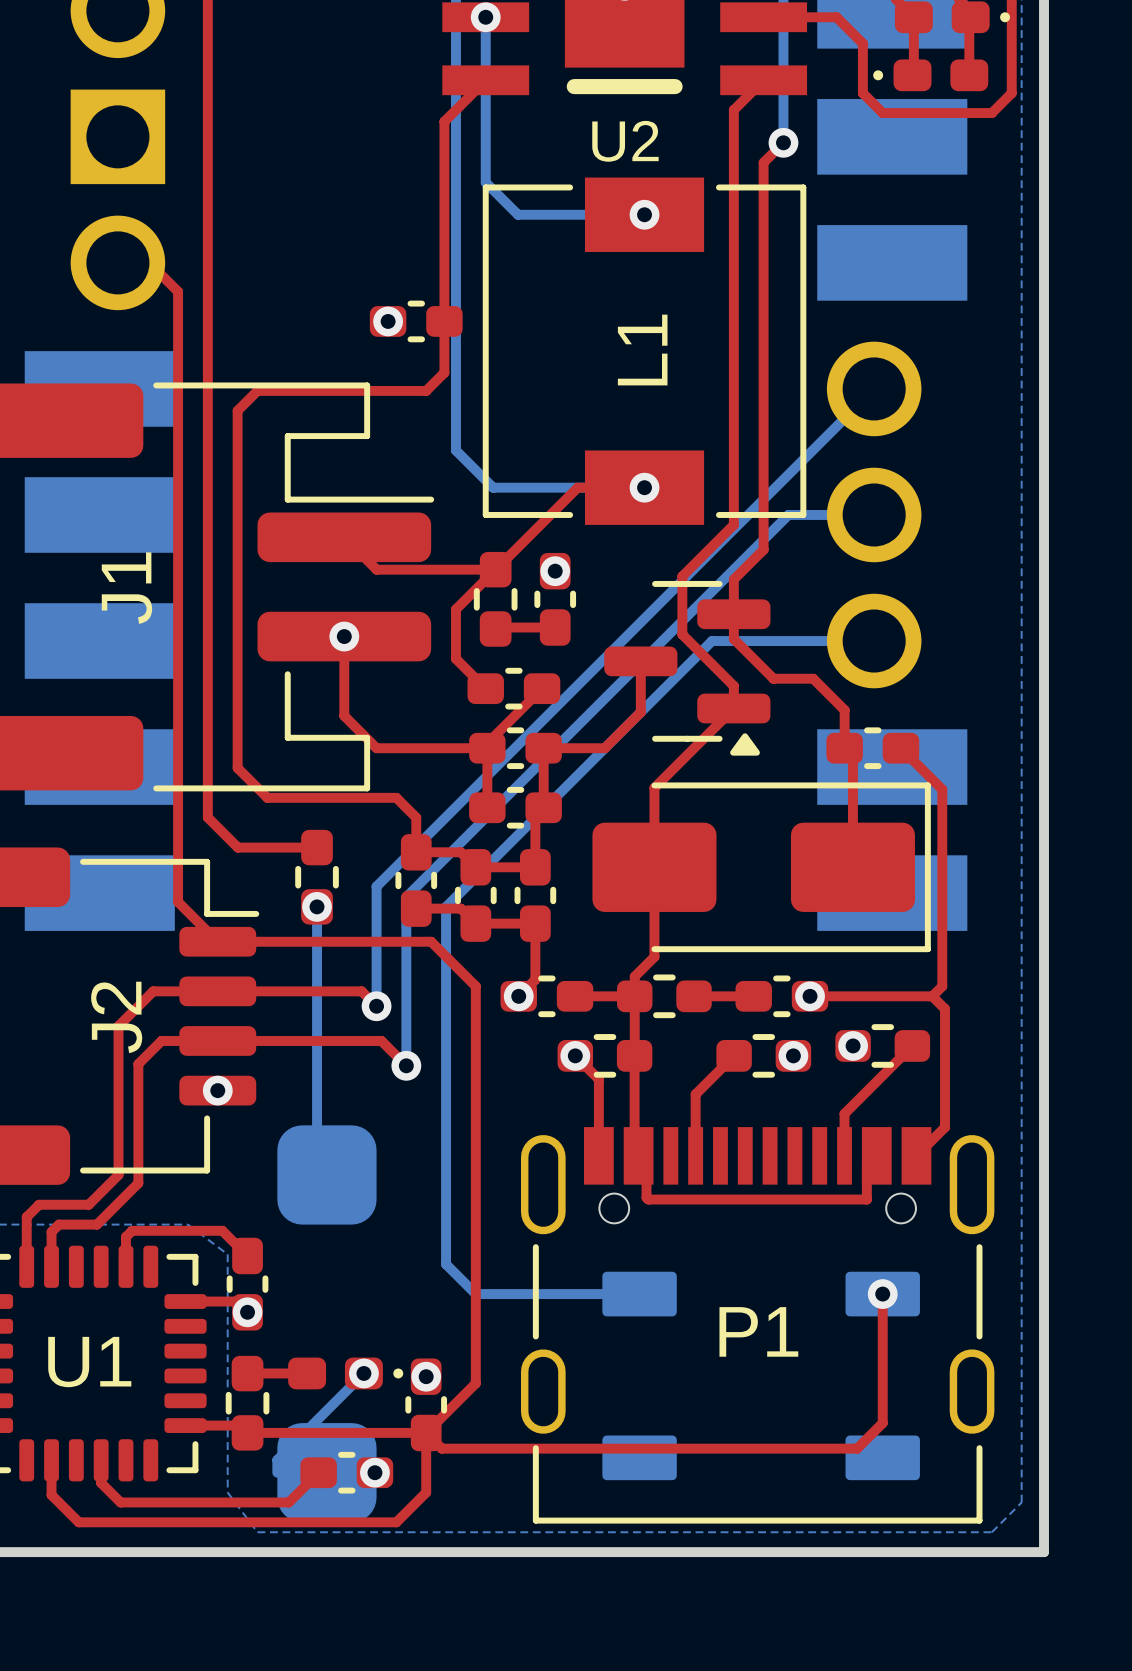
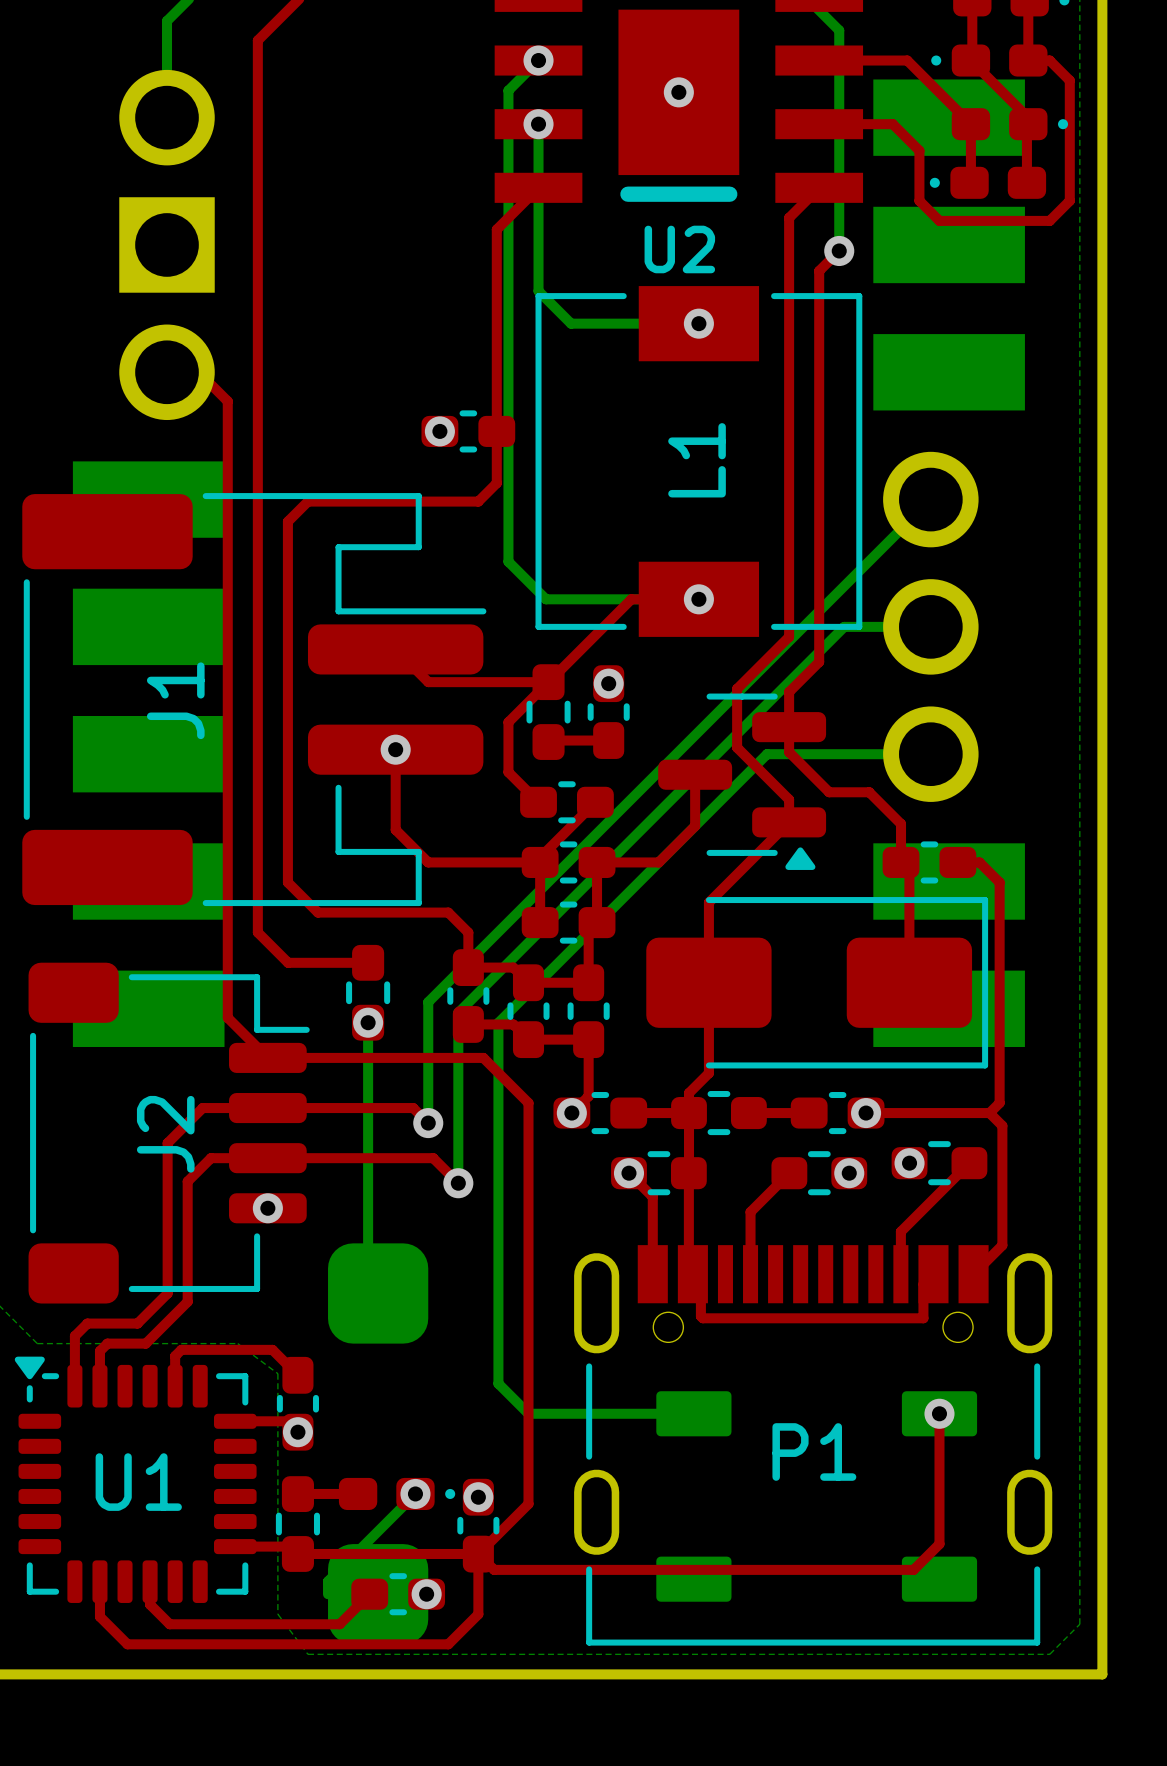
top track: (900, 748) (942, 789) -> (957, 862) (979, 862) (999, 882) (999, 904)

